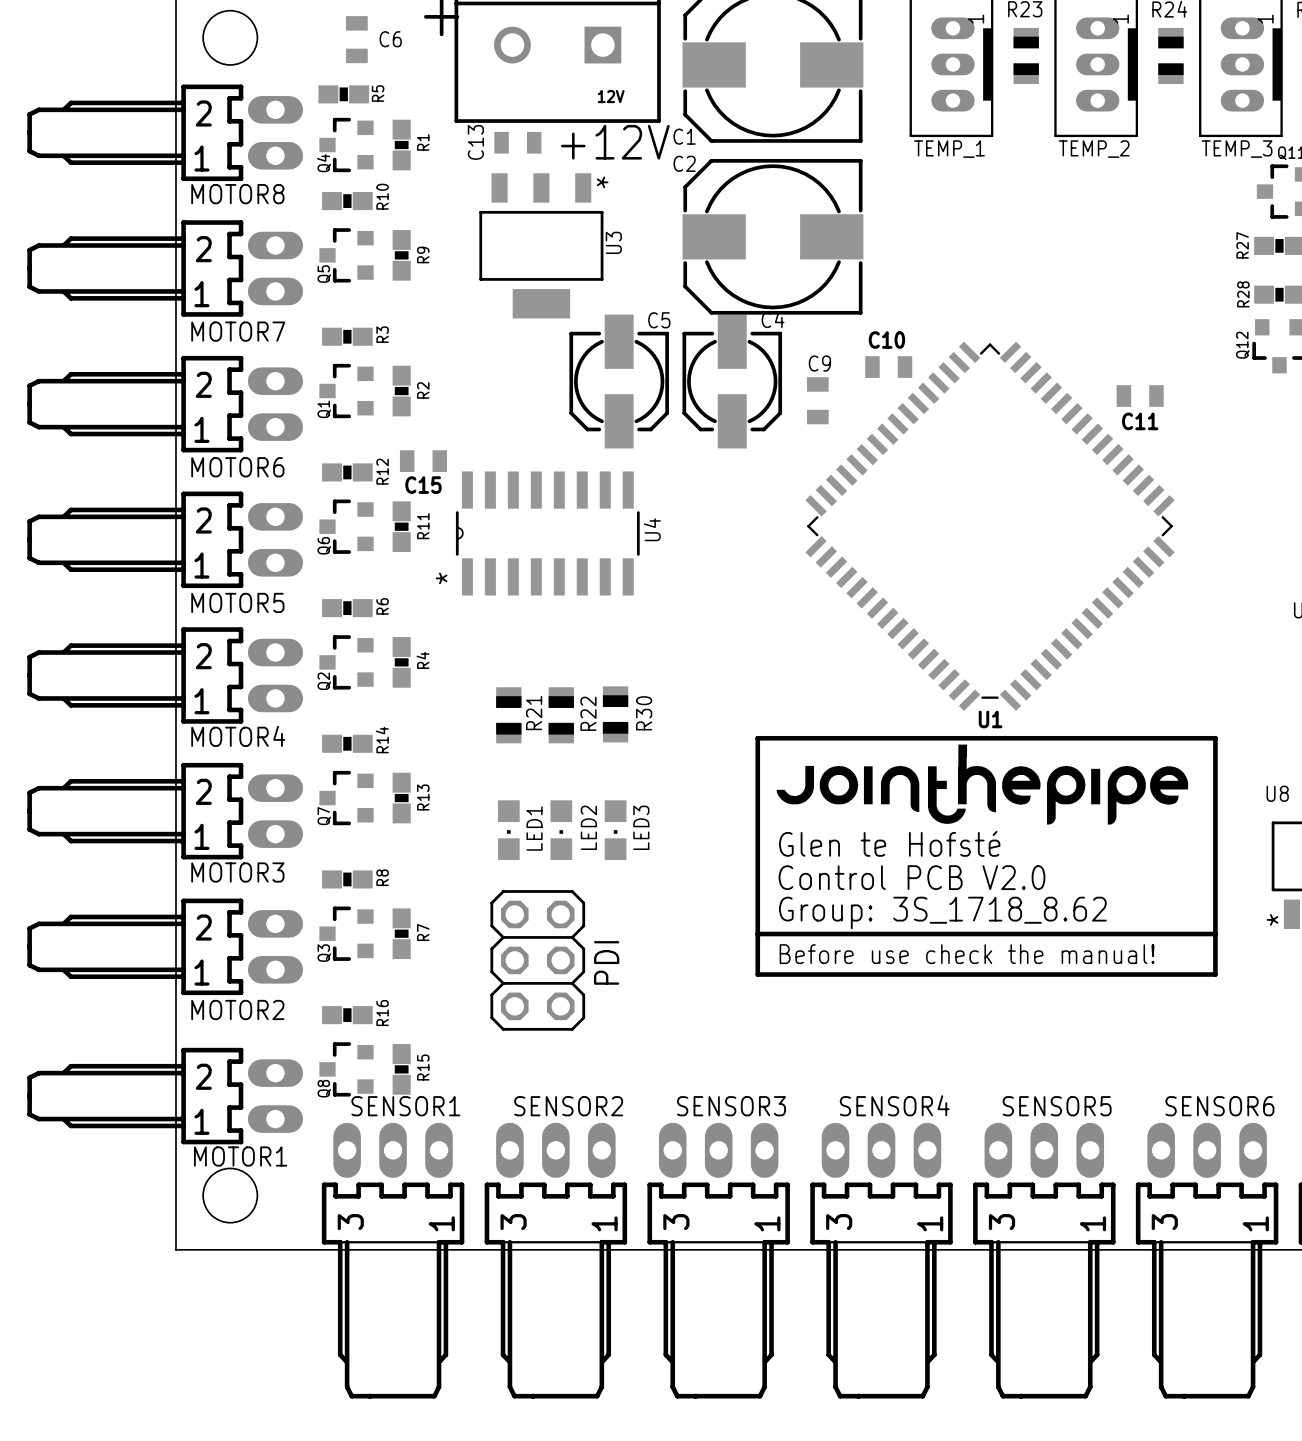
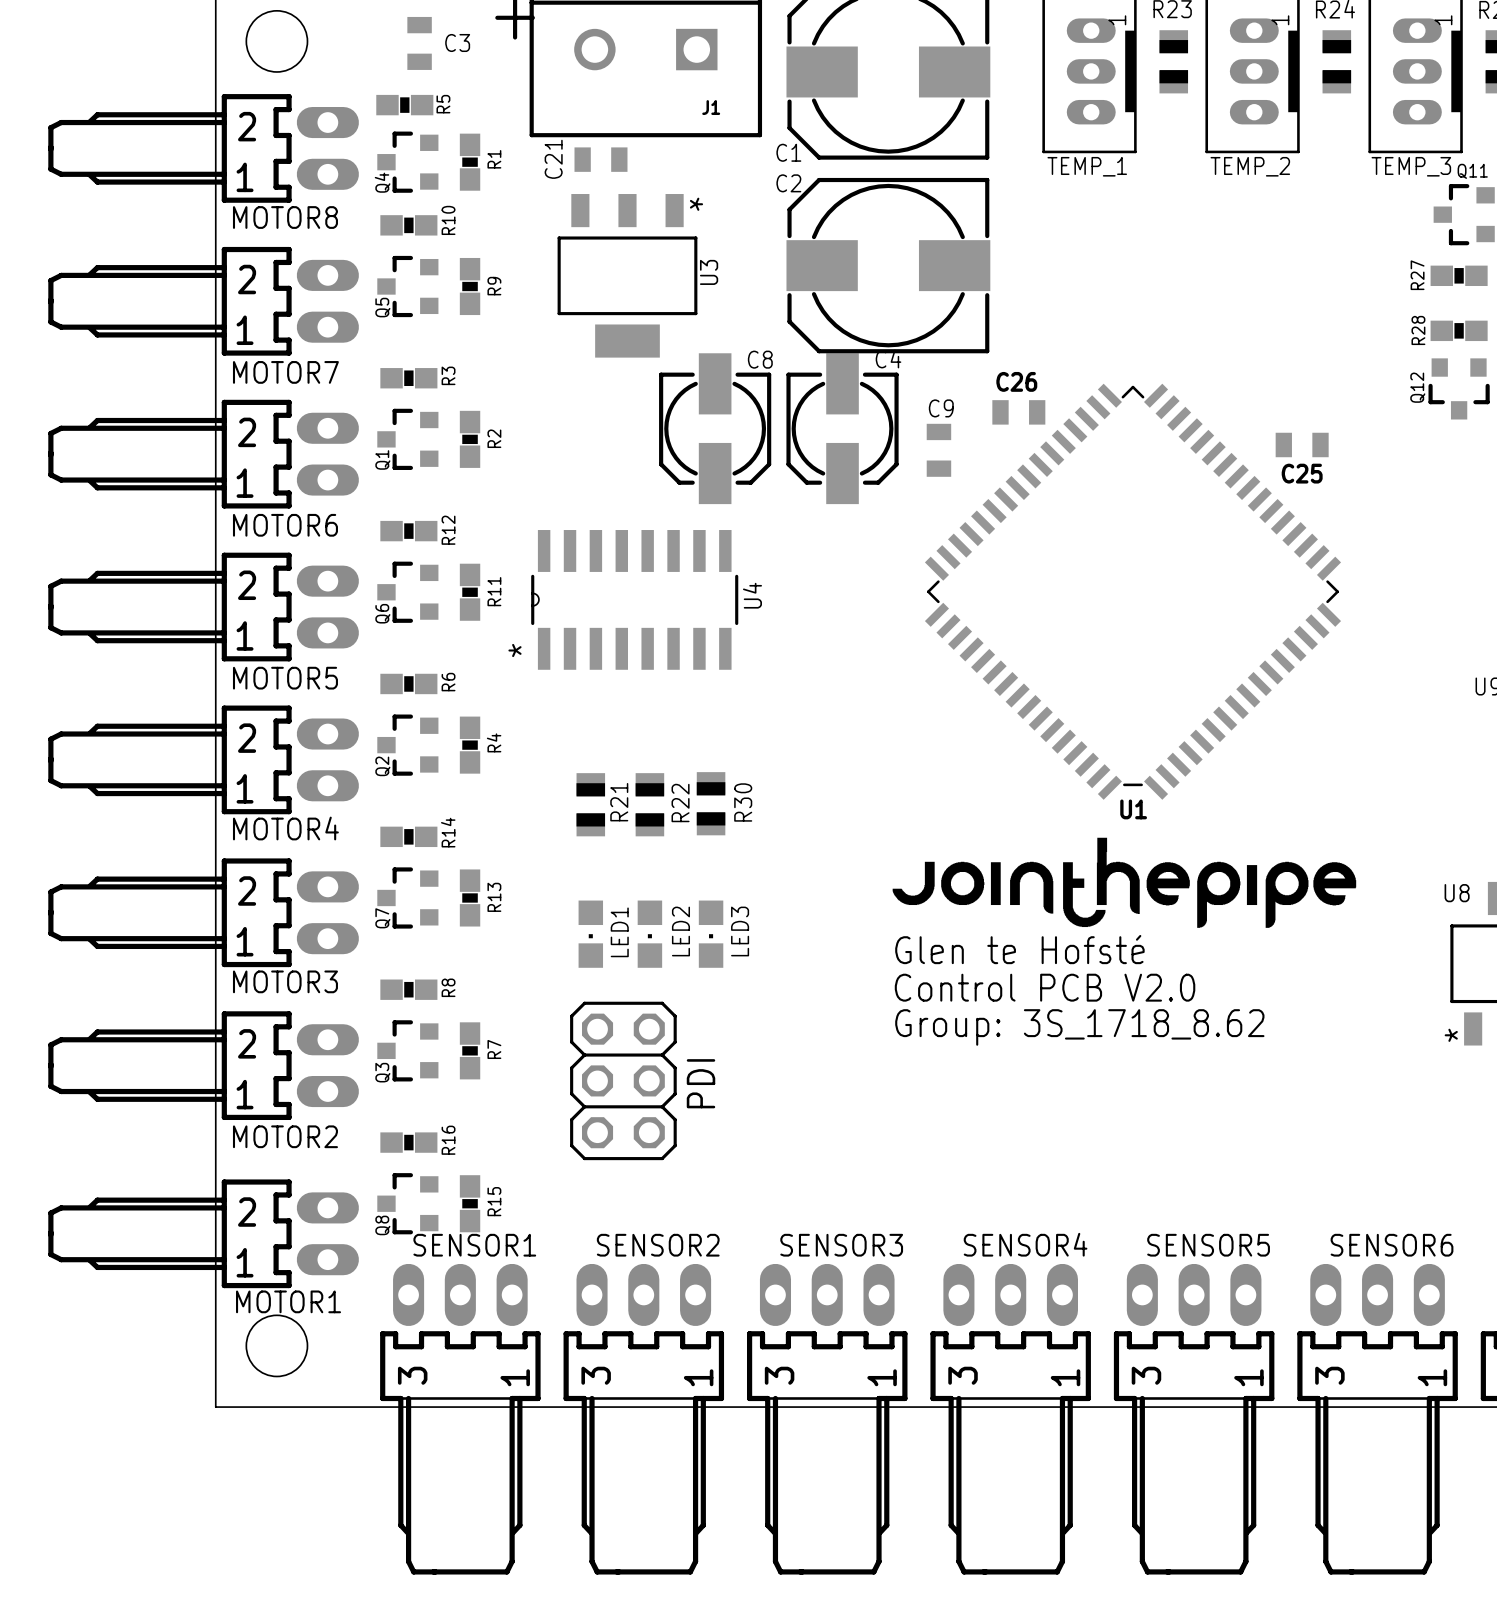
C6 name: C6 (390, 39) -> C3 (457, 42)
12V name: 12V (611, 96) -> J1 (711, 107)
C13 name: C13 (475, 142) -> C21 (553, 159)
text: +12V (615, 142) -> none
C5 name: C5 (659, 320) -> C8 (760, 359)
C10 name: C10 (886, 340) -> C26 (1016, 381)
C11 name: C11 (1140, 421) -> C25 (1302, 473)
C15: (423, 461) -> none
line: (1215, 934) (757, 934) (757, 738) (1215, 738) (1215, 974) (757, 974) (757, 934) -> none
text: Before use check the manual! (967, 954) -> none

